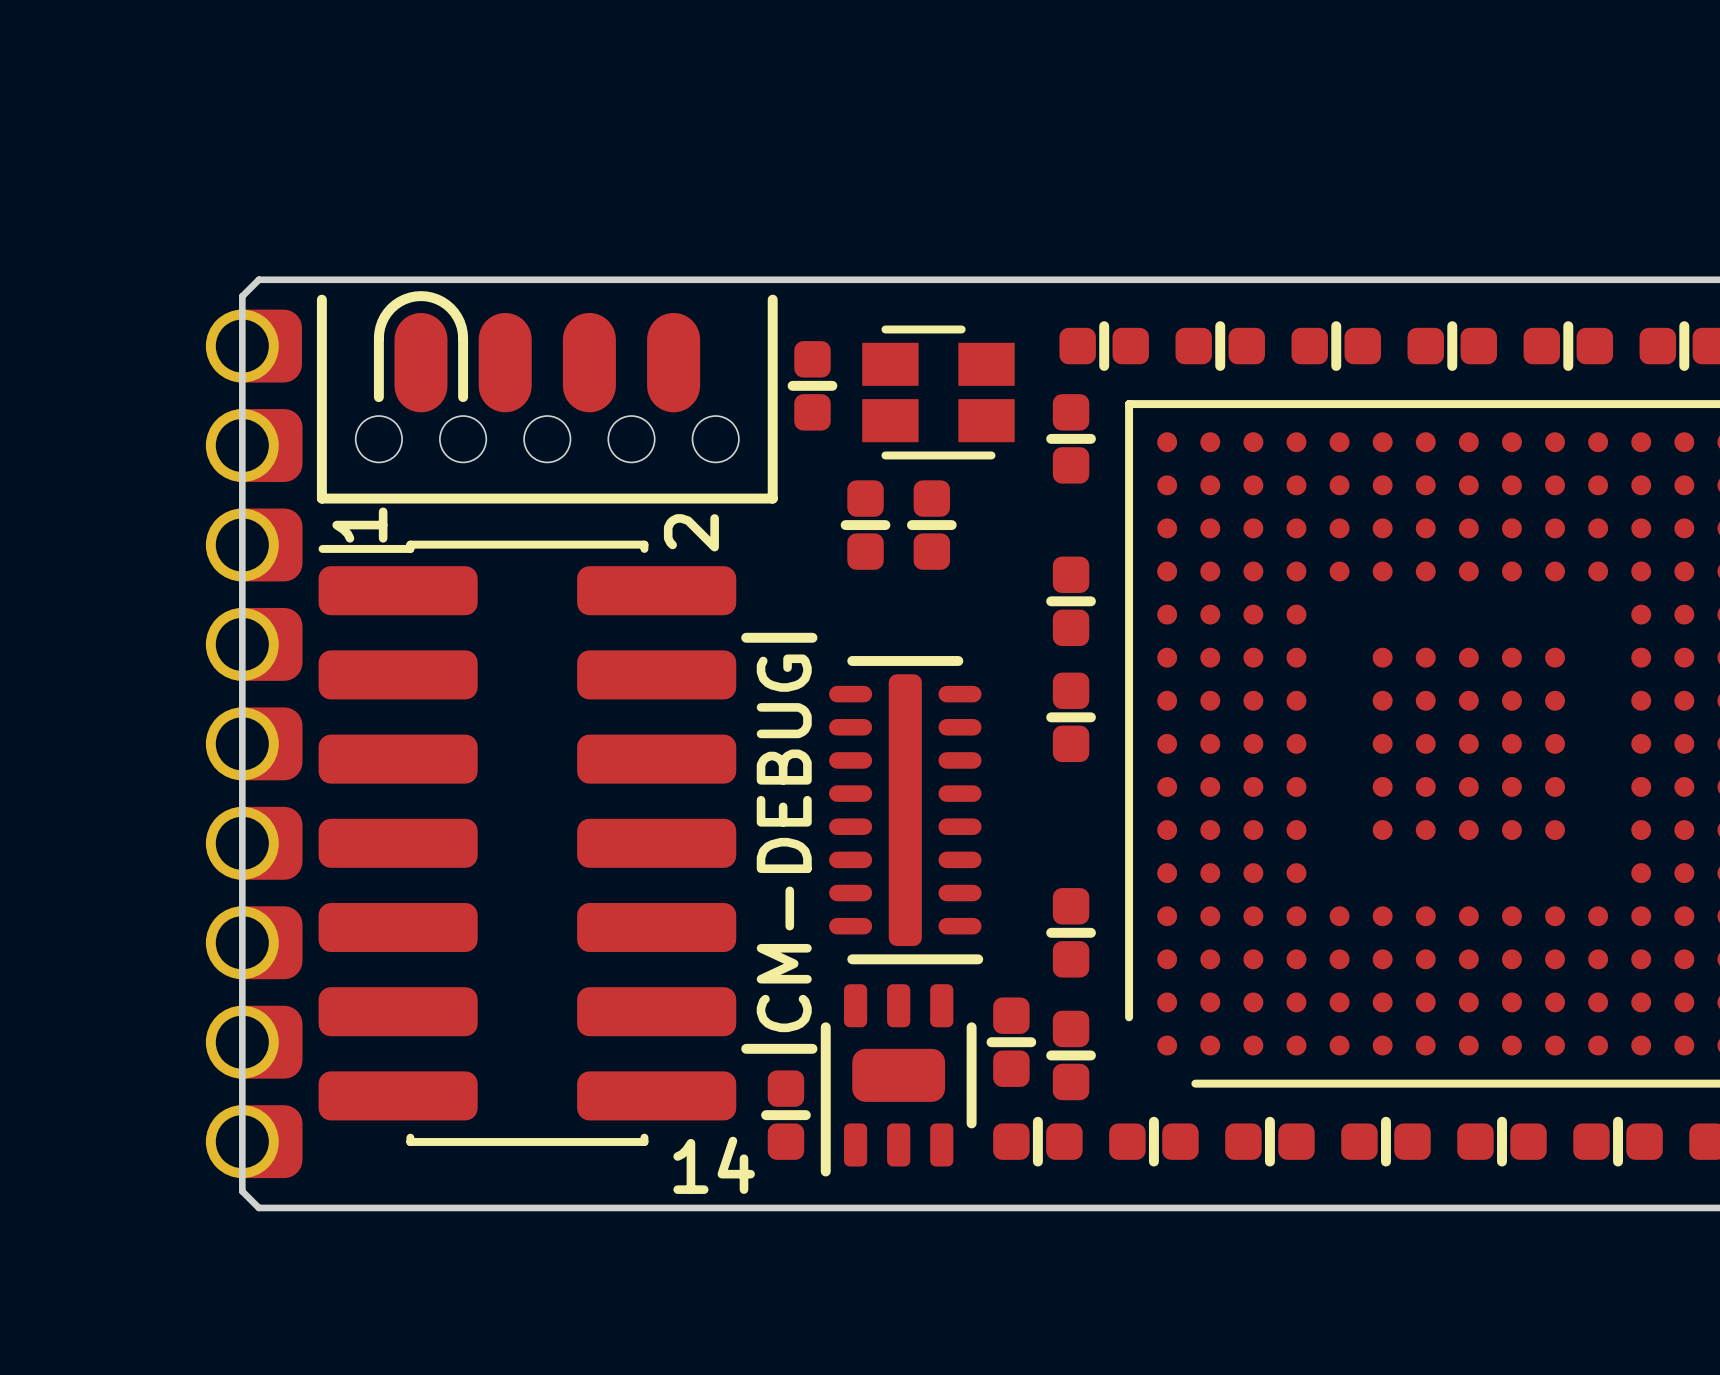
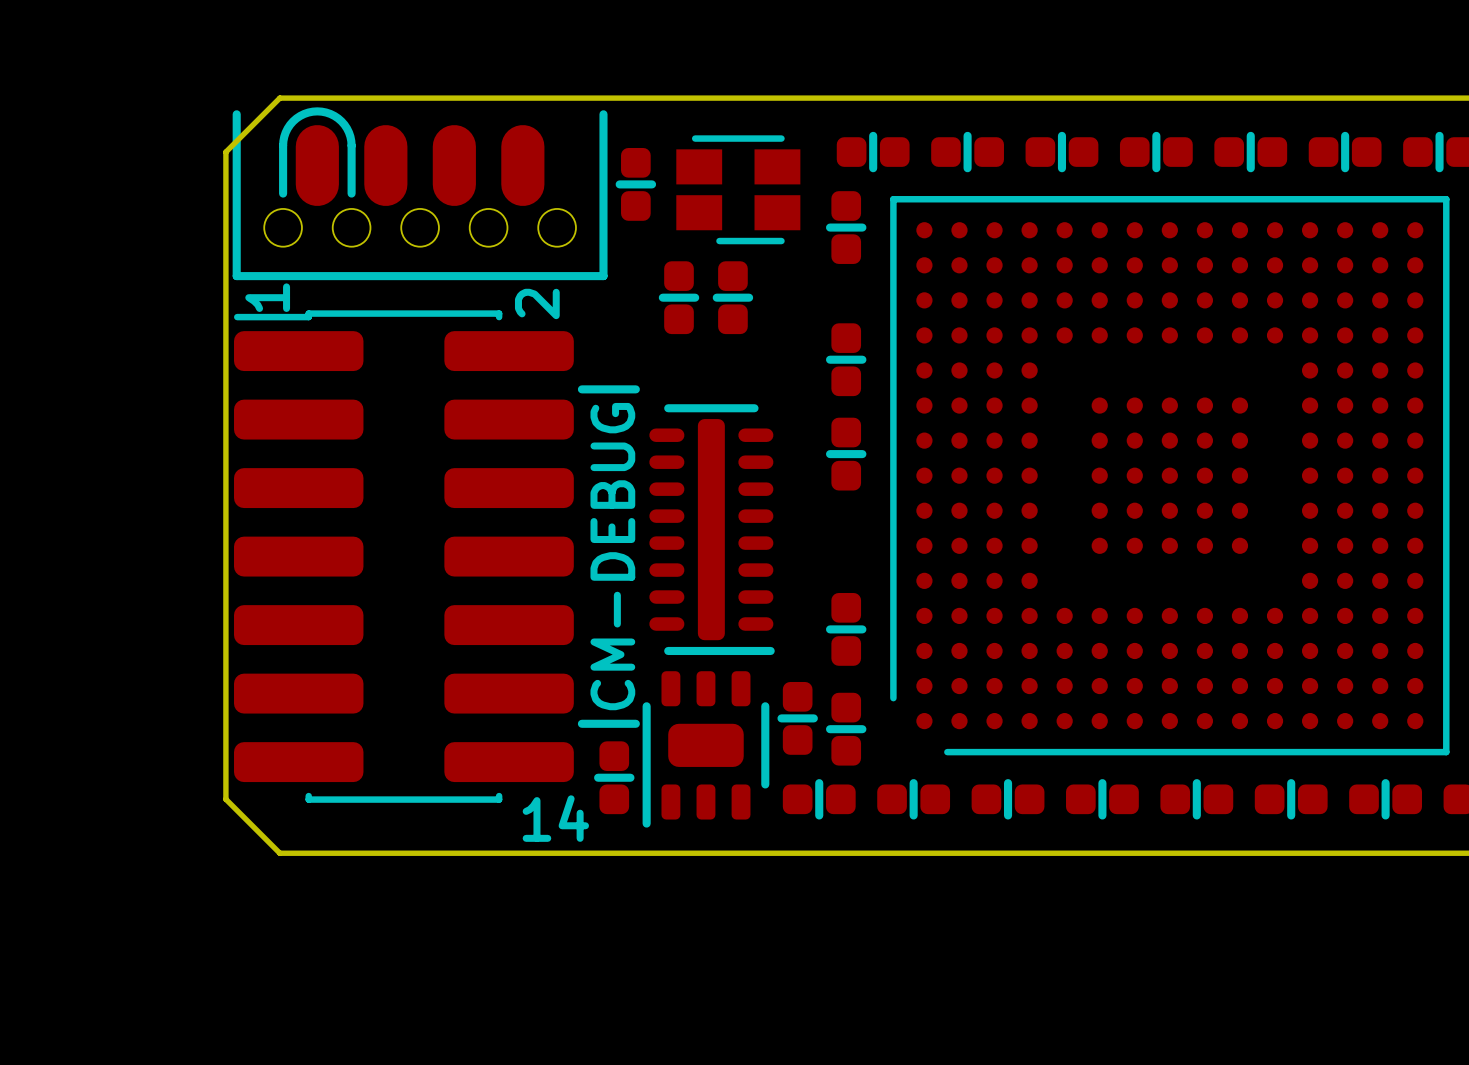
board edge: (374, 279) (258, 279) (242, 296) (242, 1191) (258, 1207) (374, 1207) -> (279, 98) (225, 152) (225, 799) (279, 853)
part rotation: 0° (938, 392) -> 180° (738, 189)
part: (254, 743) -> none

